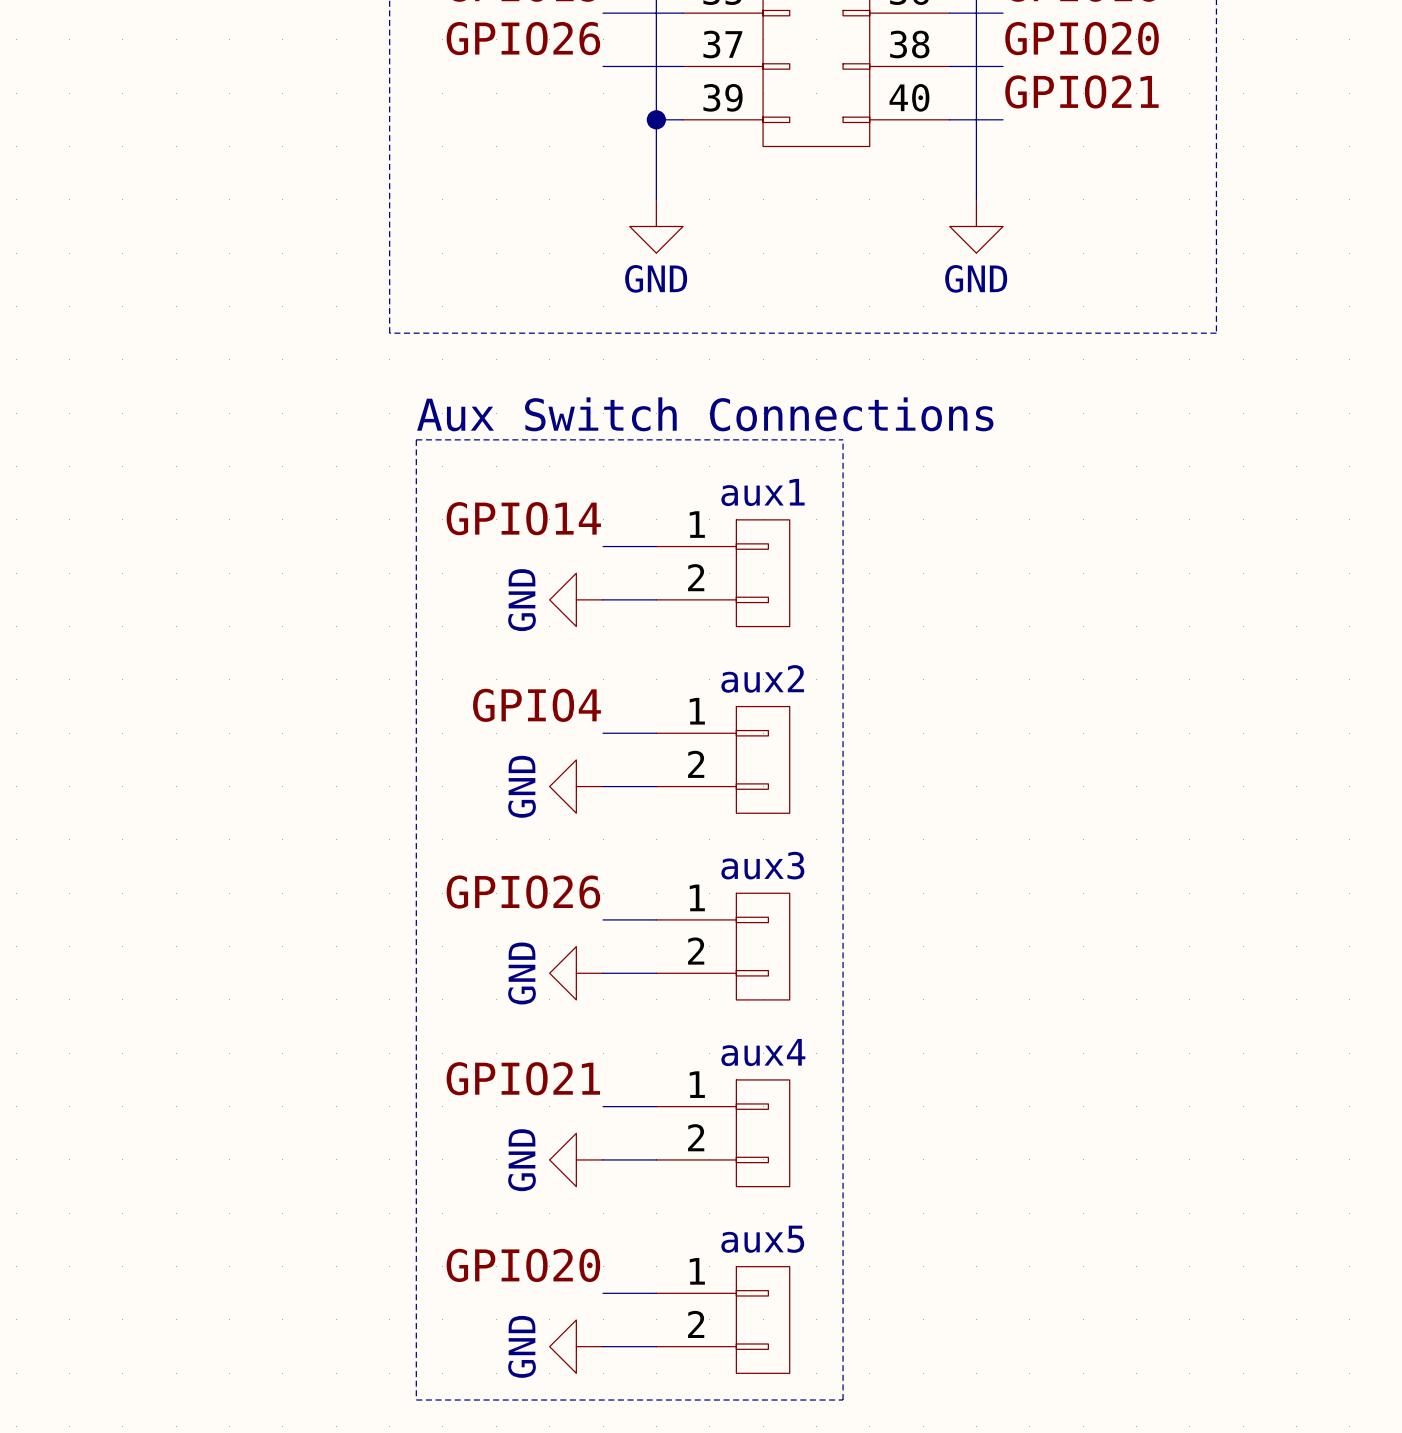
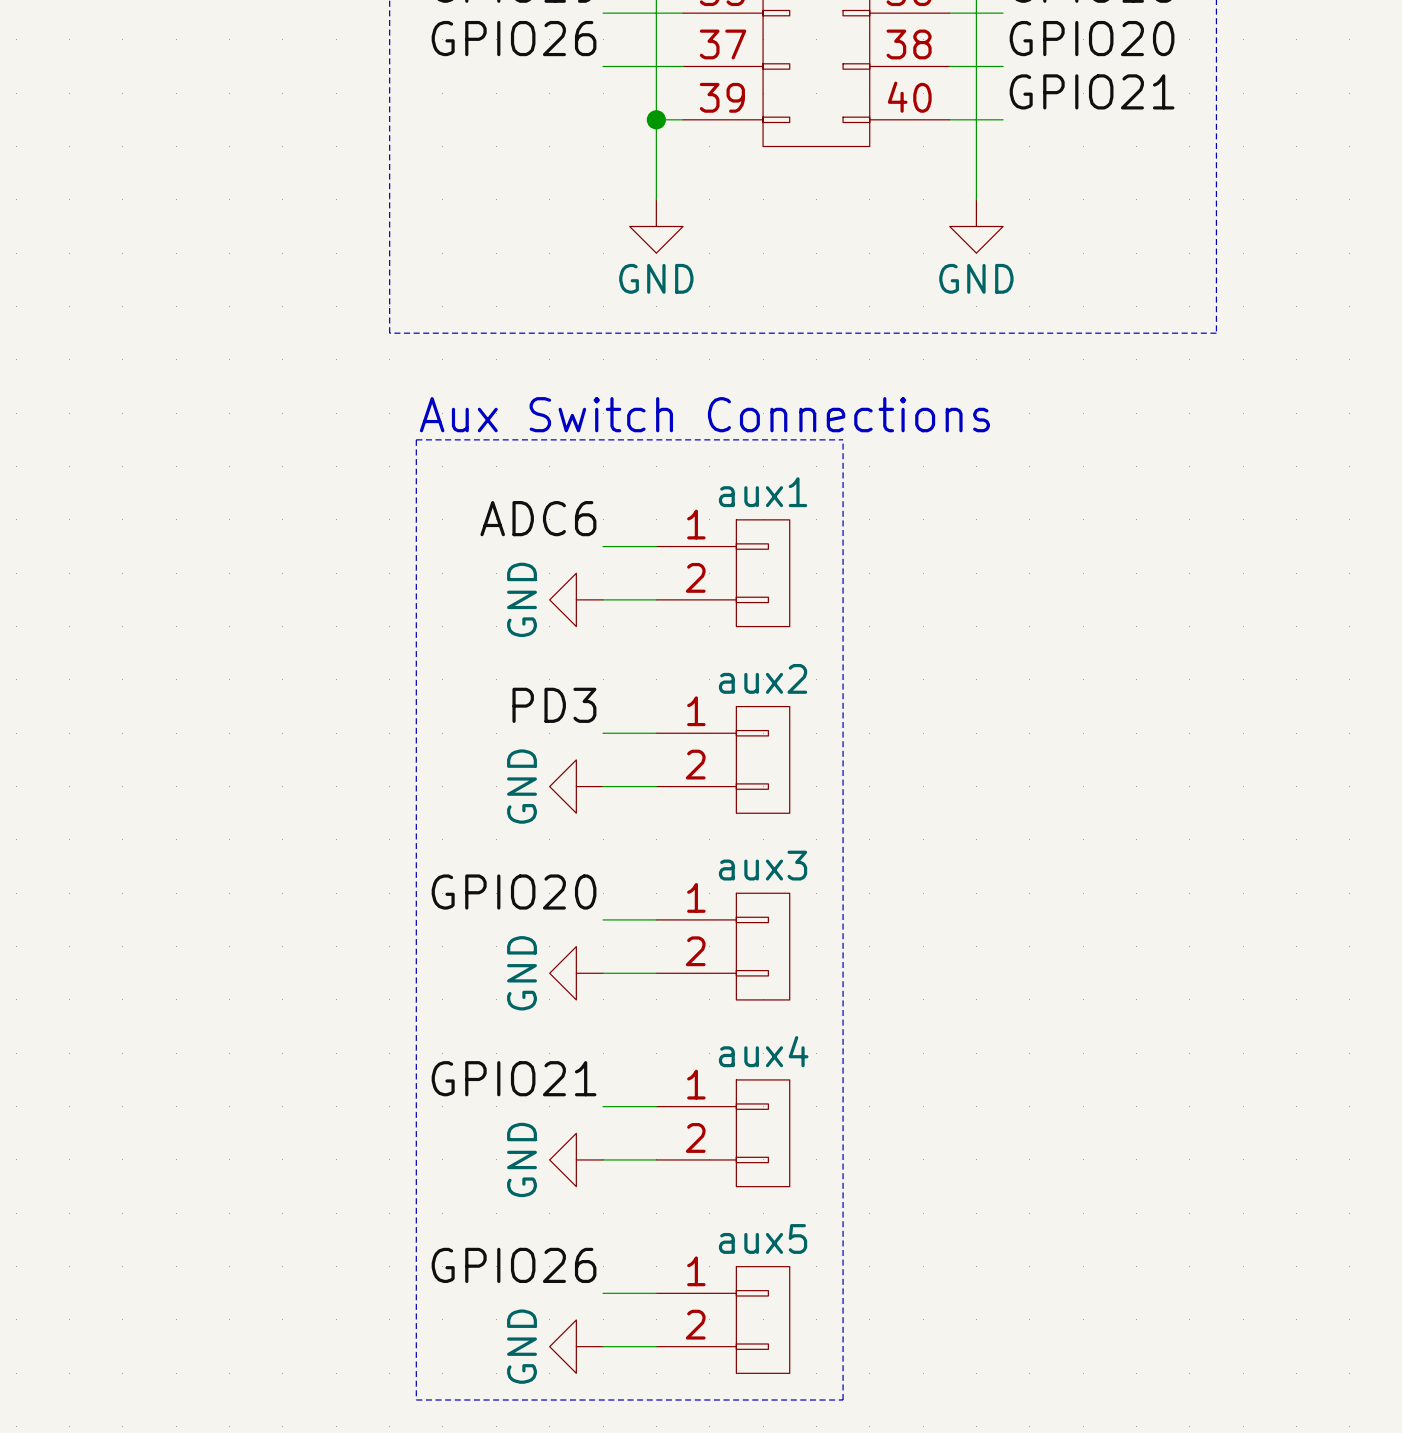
label: GPIO14 (523, 518) -> ADC6 (538, 518)
label: GPIO4 (536, 705) -> PD3 (554, 705)
label: GPIO26 (523, 892) -> GPIO20 (514, 892)
label: GPIO20 (523, 1265) -> GPIO26 (514, 1265)

